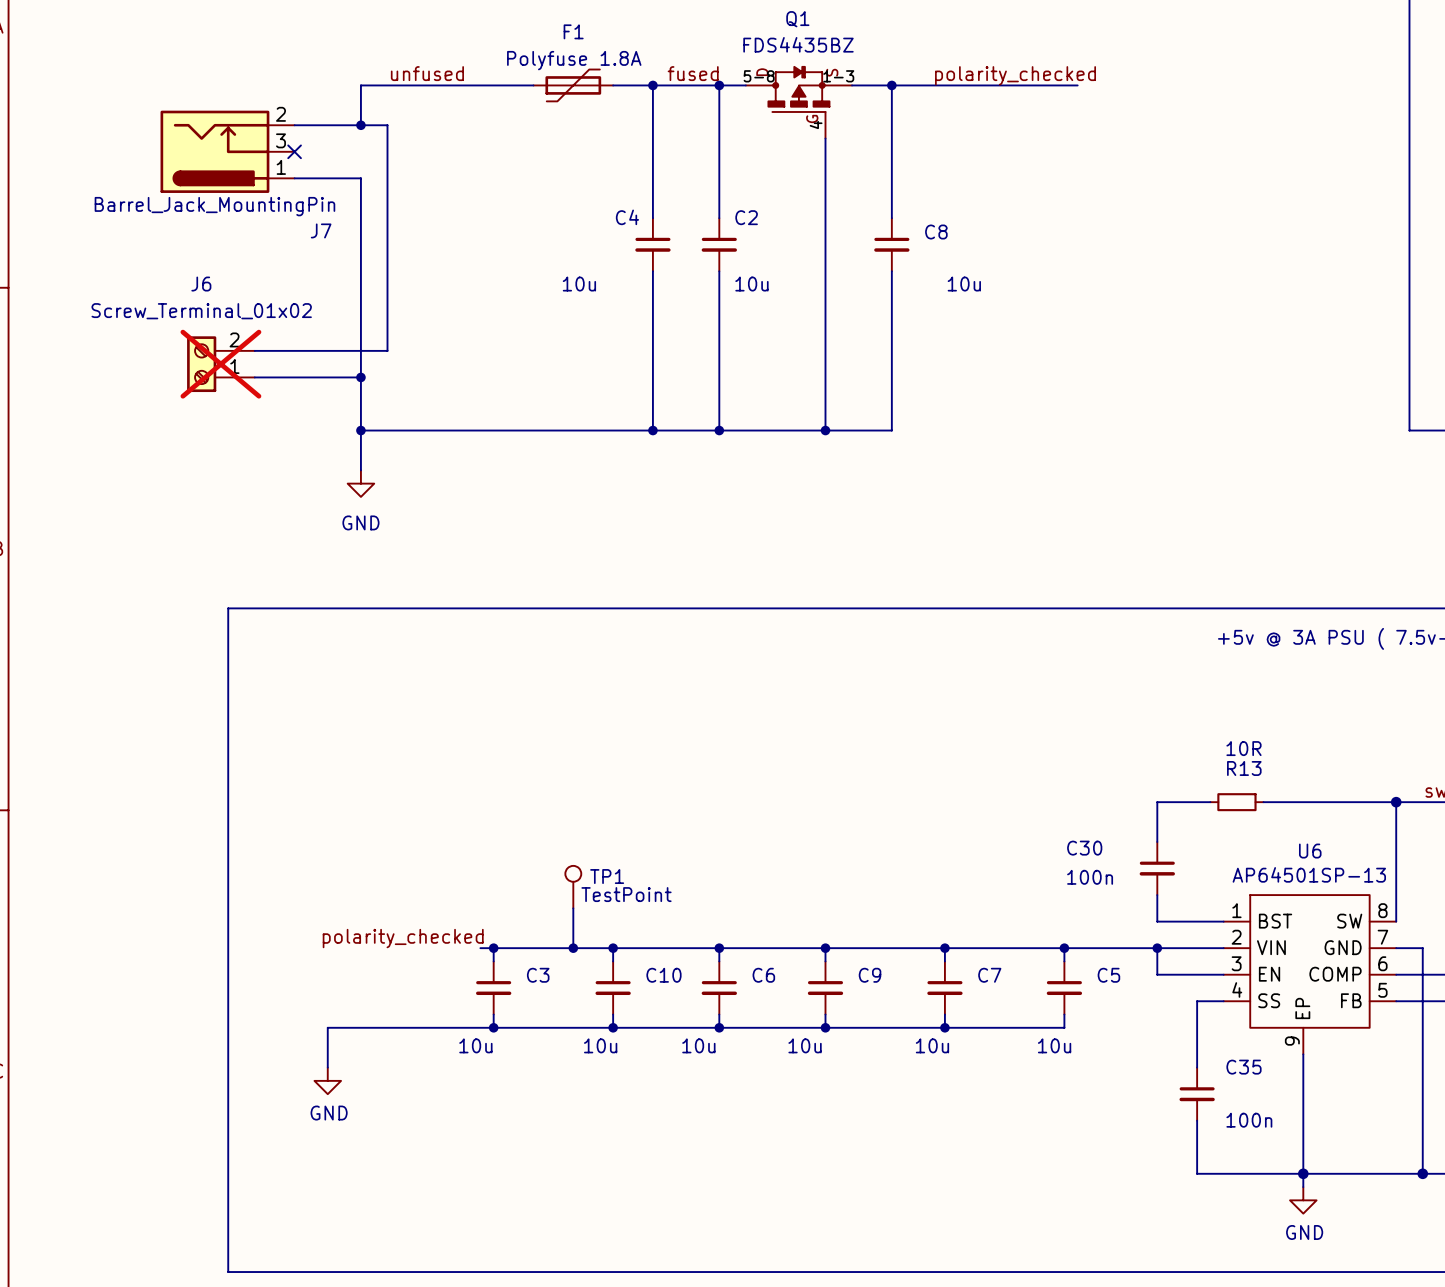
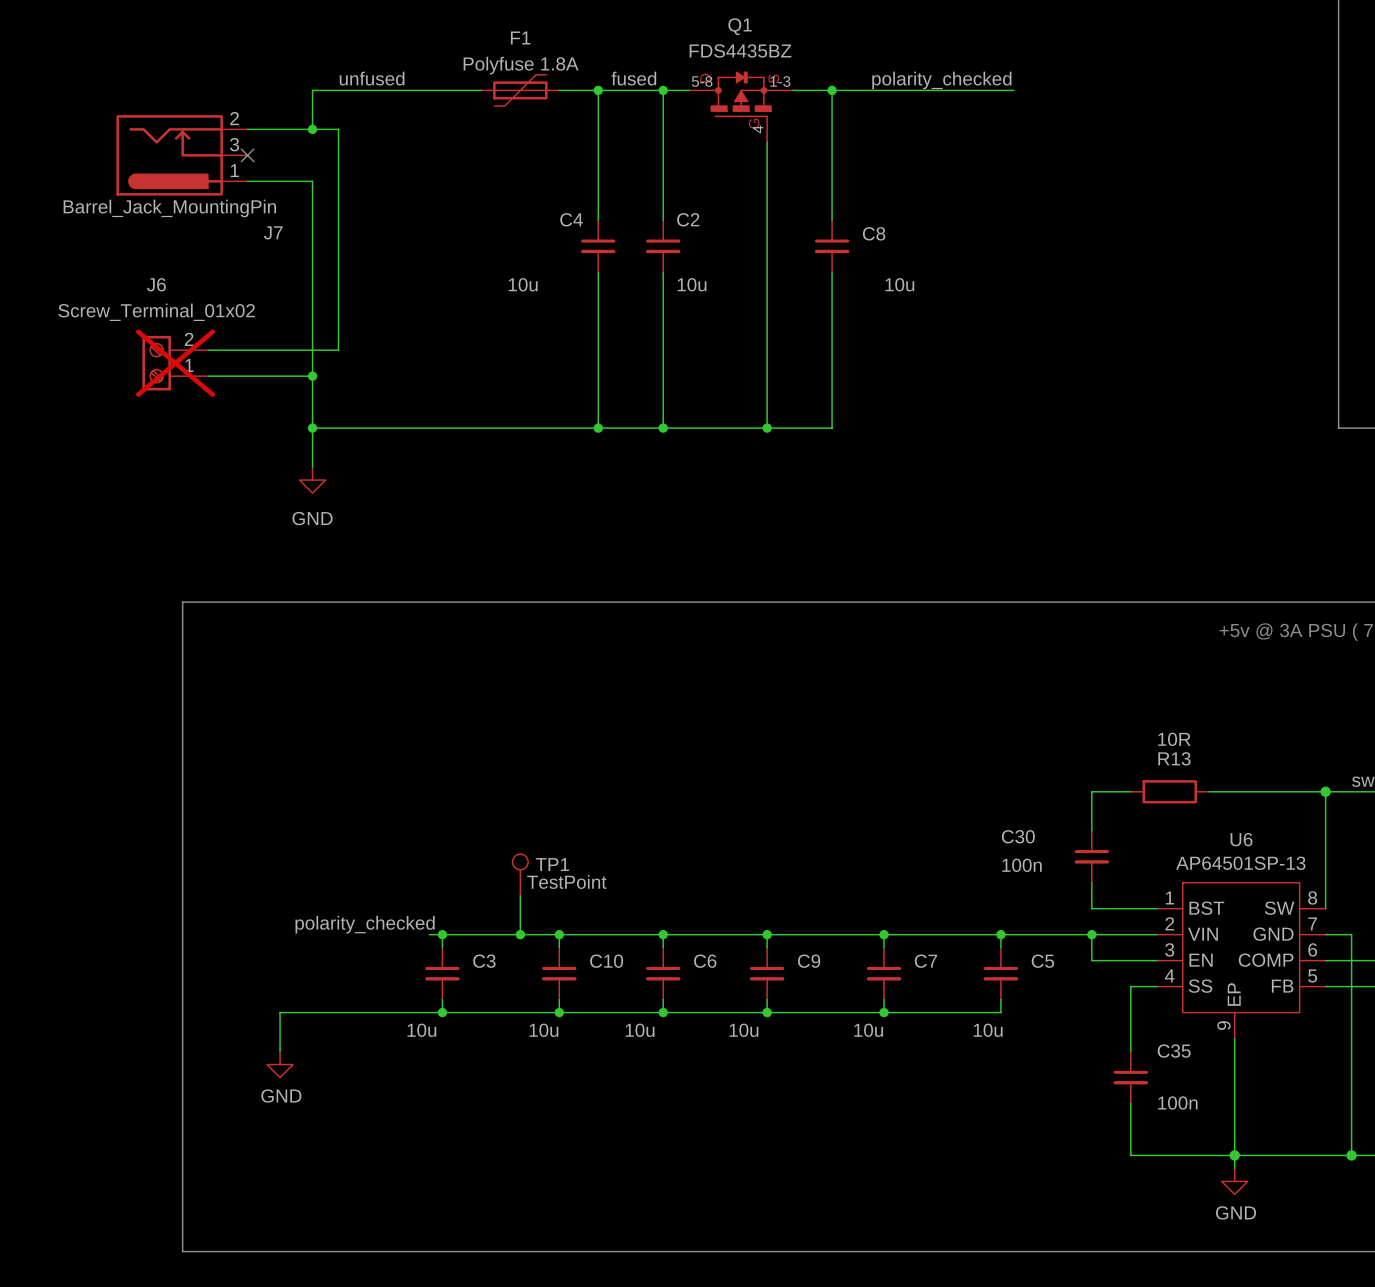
R13 symbol: [1210, 793, 1264, 812] -> [1130, 780, 1209, 804]

